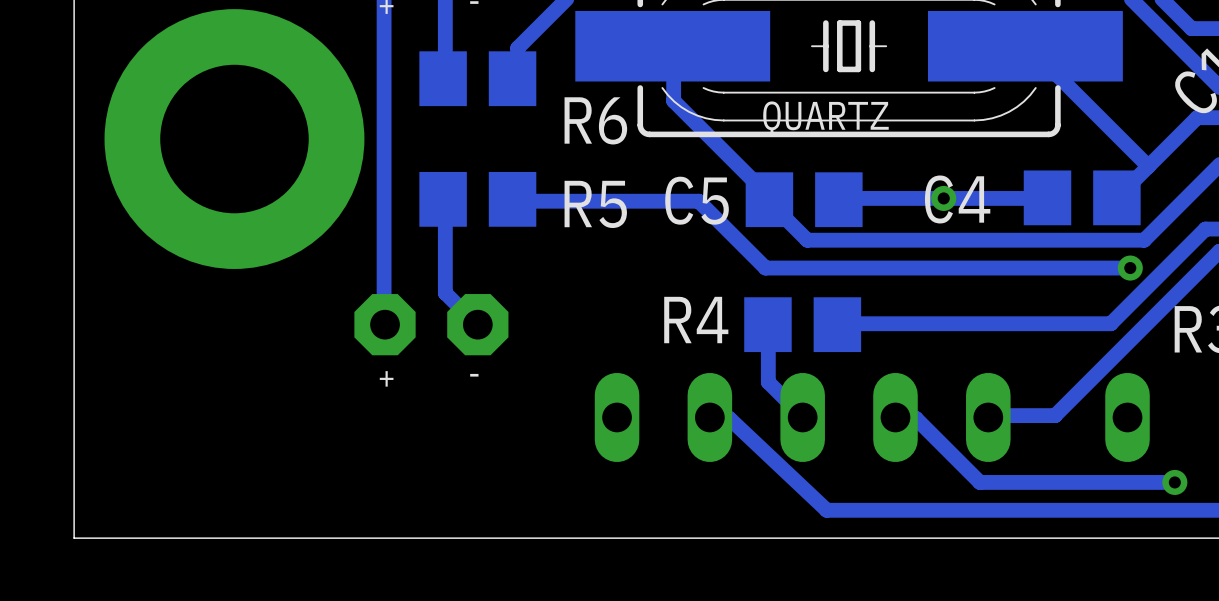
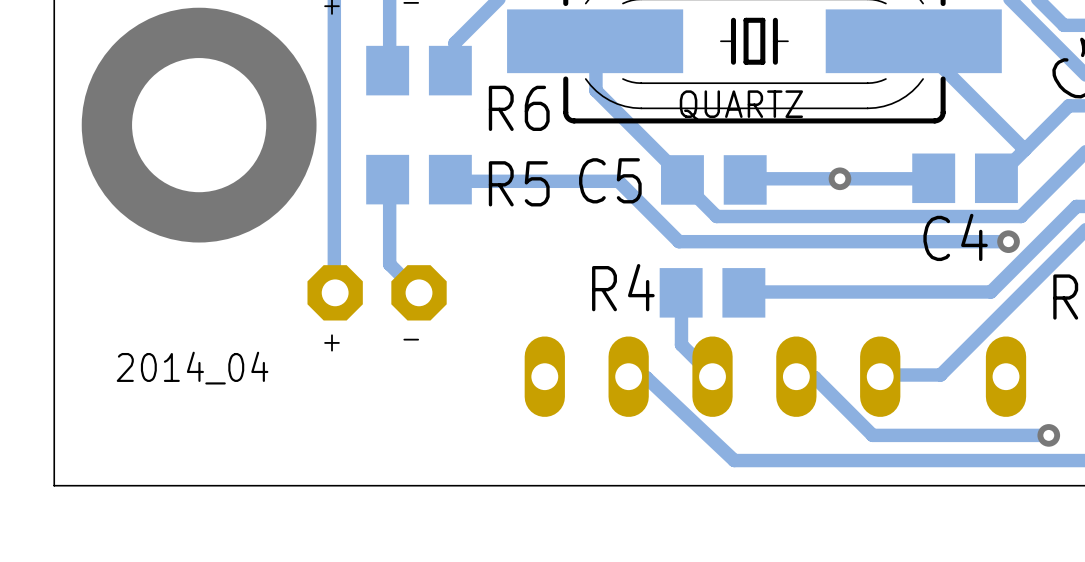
C4 name position: C4 (957, 199) -> C4 (955, 237)
text: none -> 2014_04 (192, 368)

